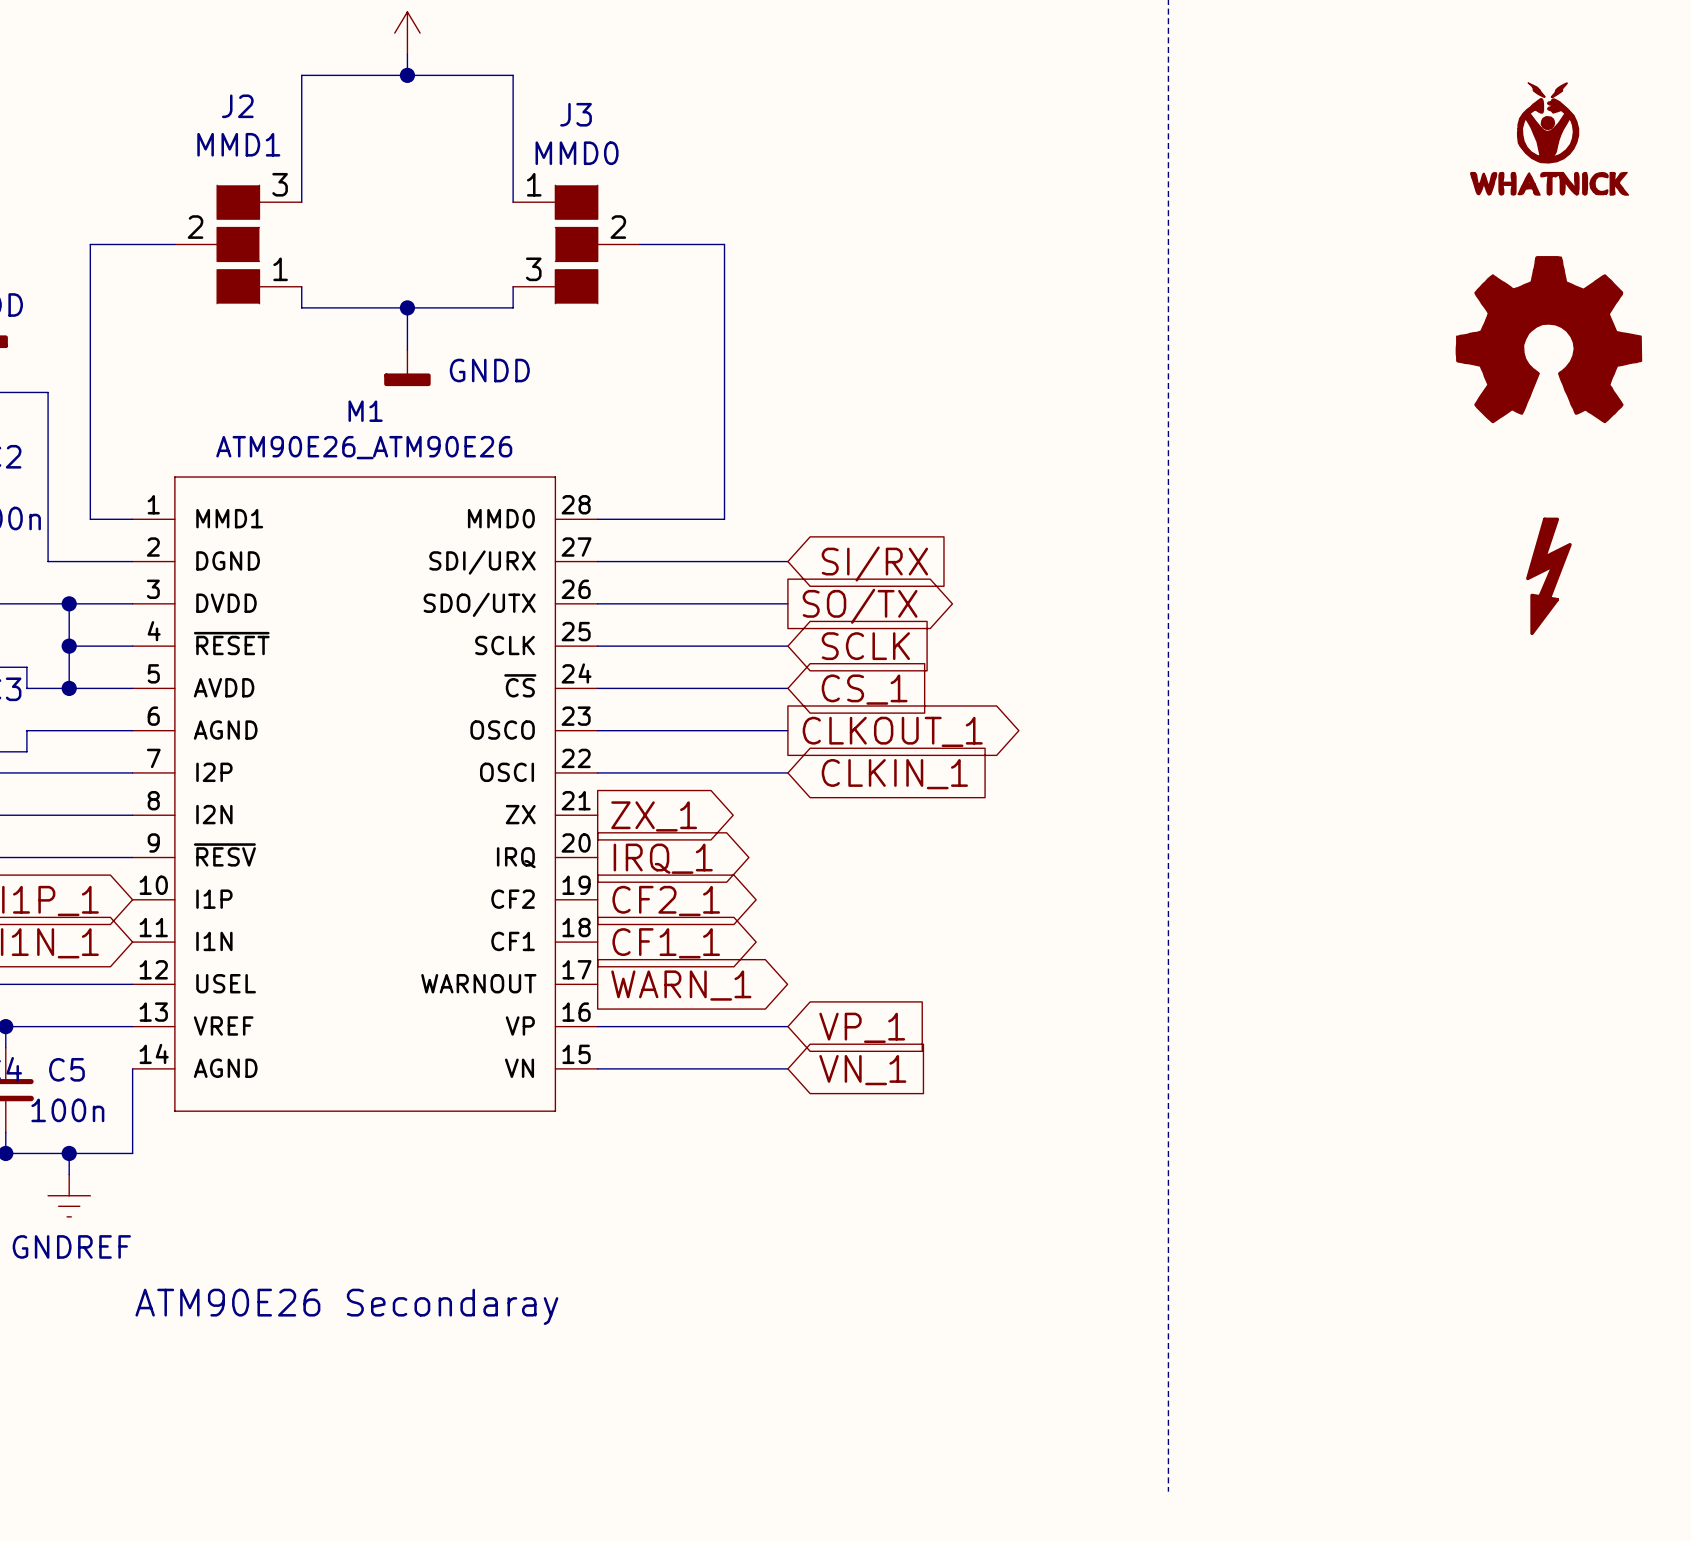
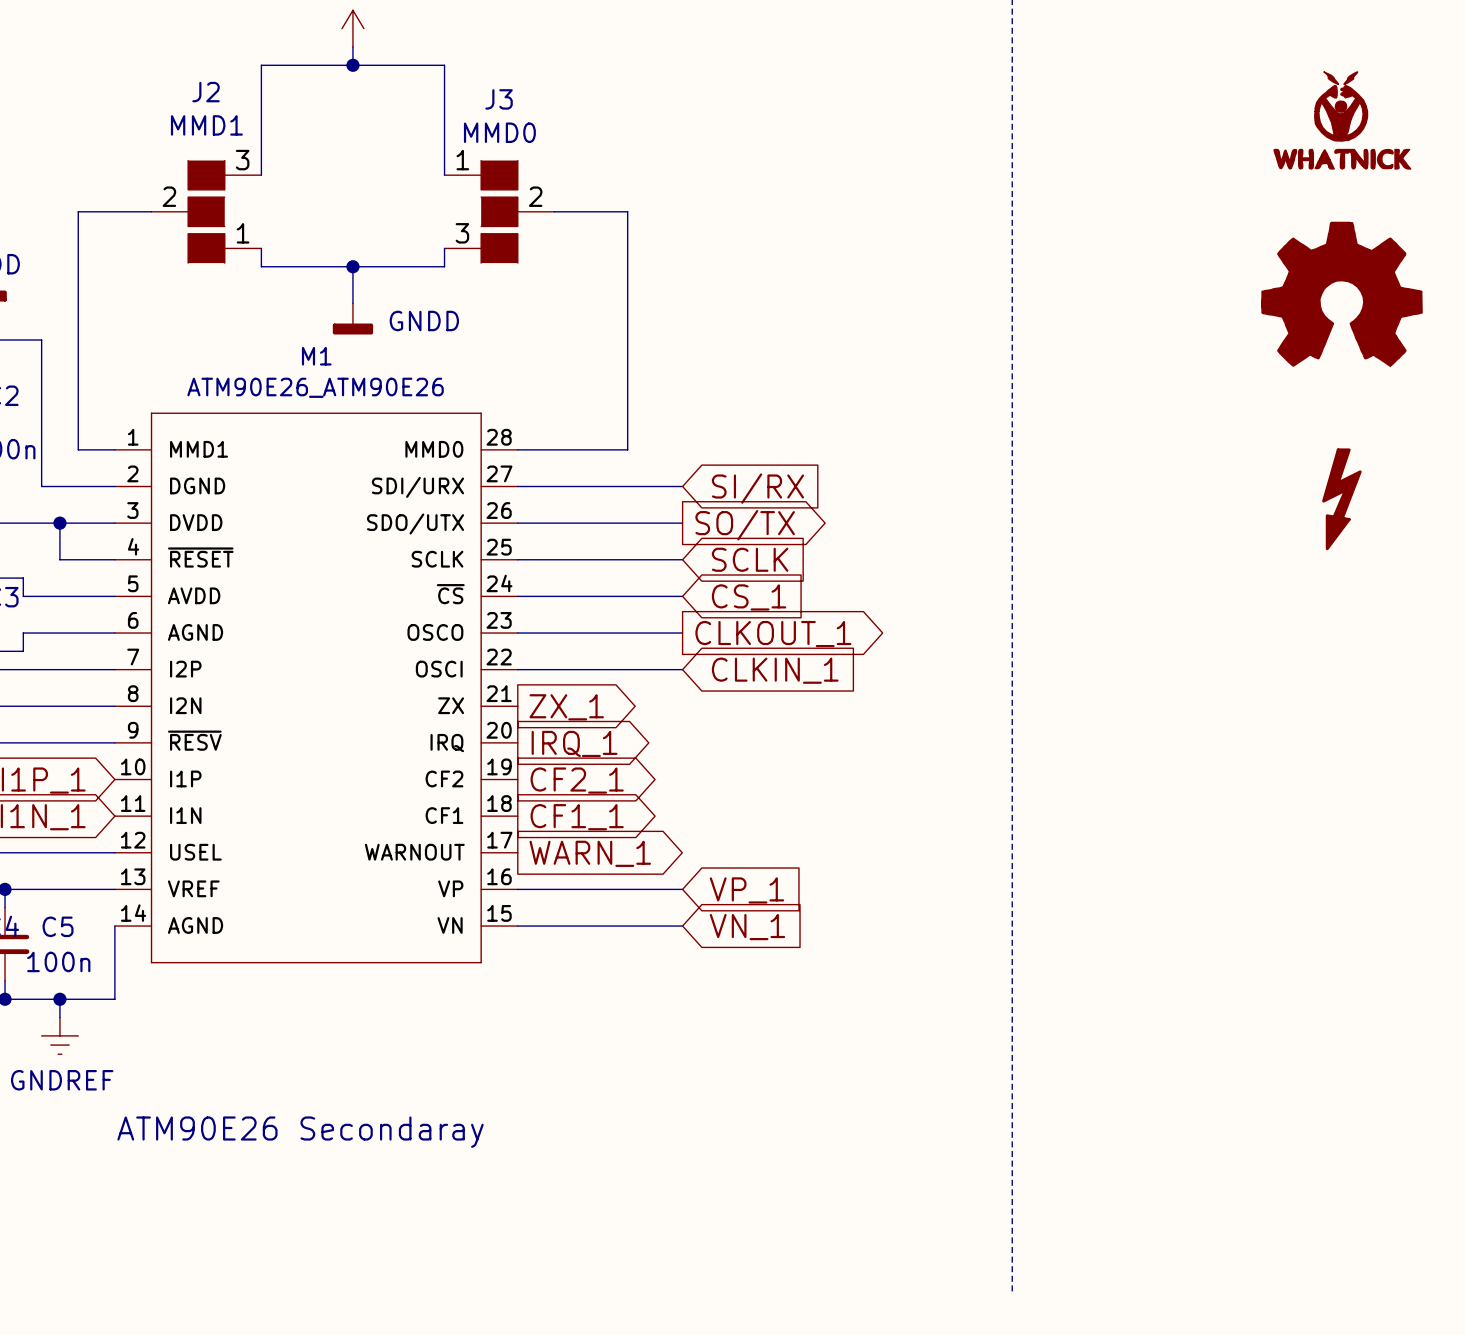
wire: (69, 646) (69, 688) -> none
junction: (69, 646) -> none
junction: (69, 688) -> none

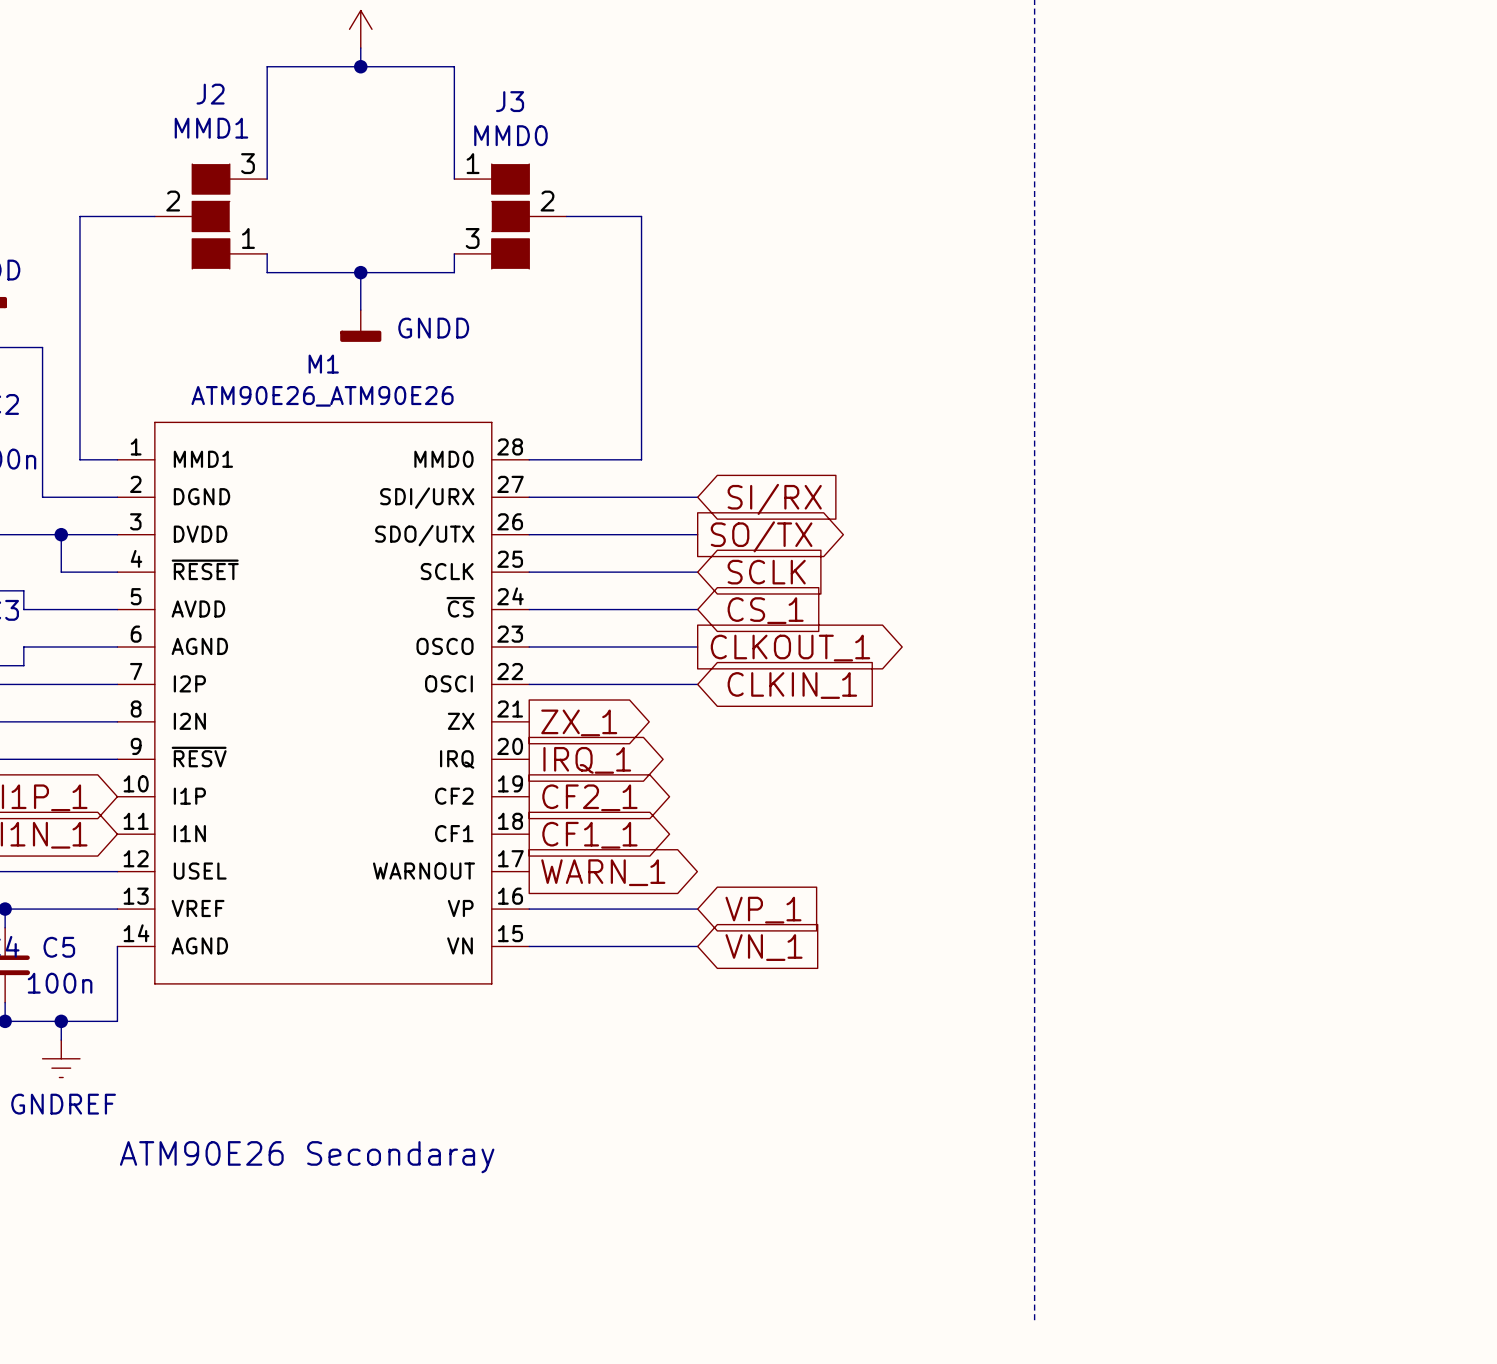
part: (1342, 120) -> none
part: (1341, 294) -> none
part: (1341, 499) -> none

